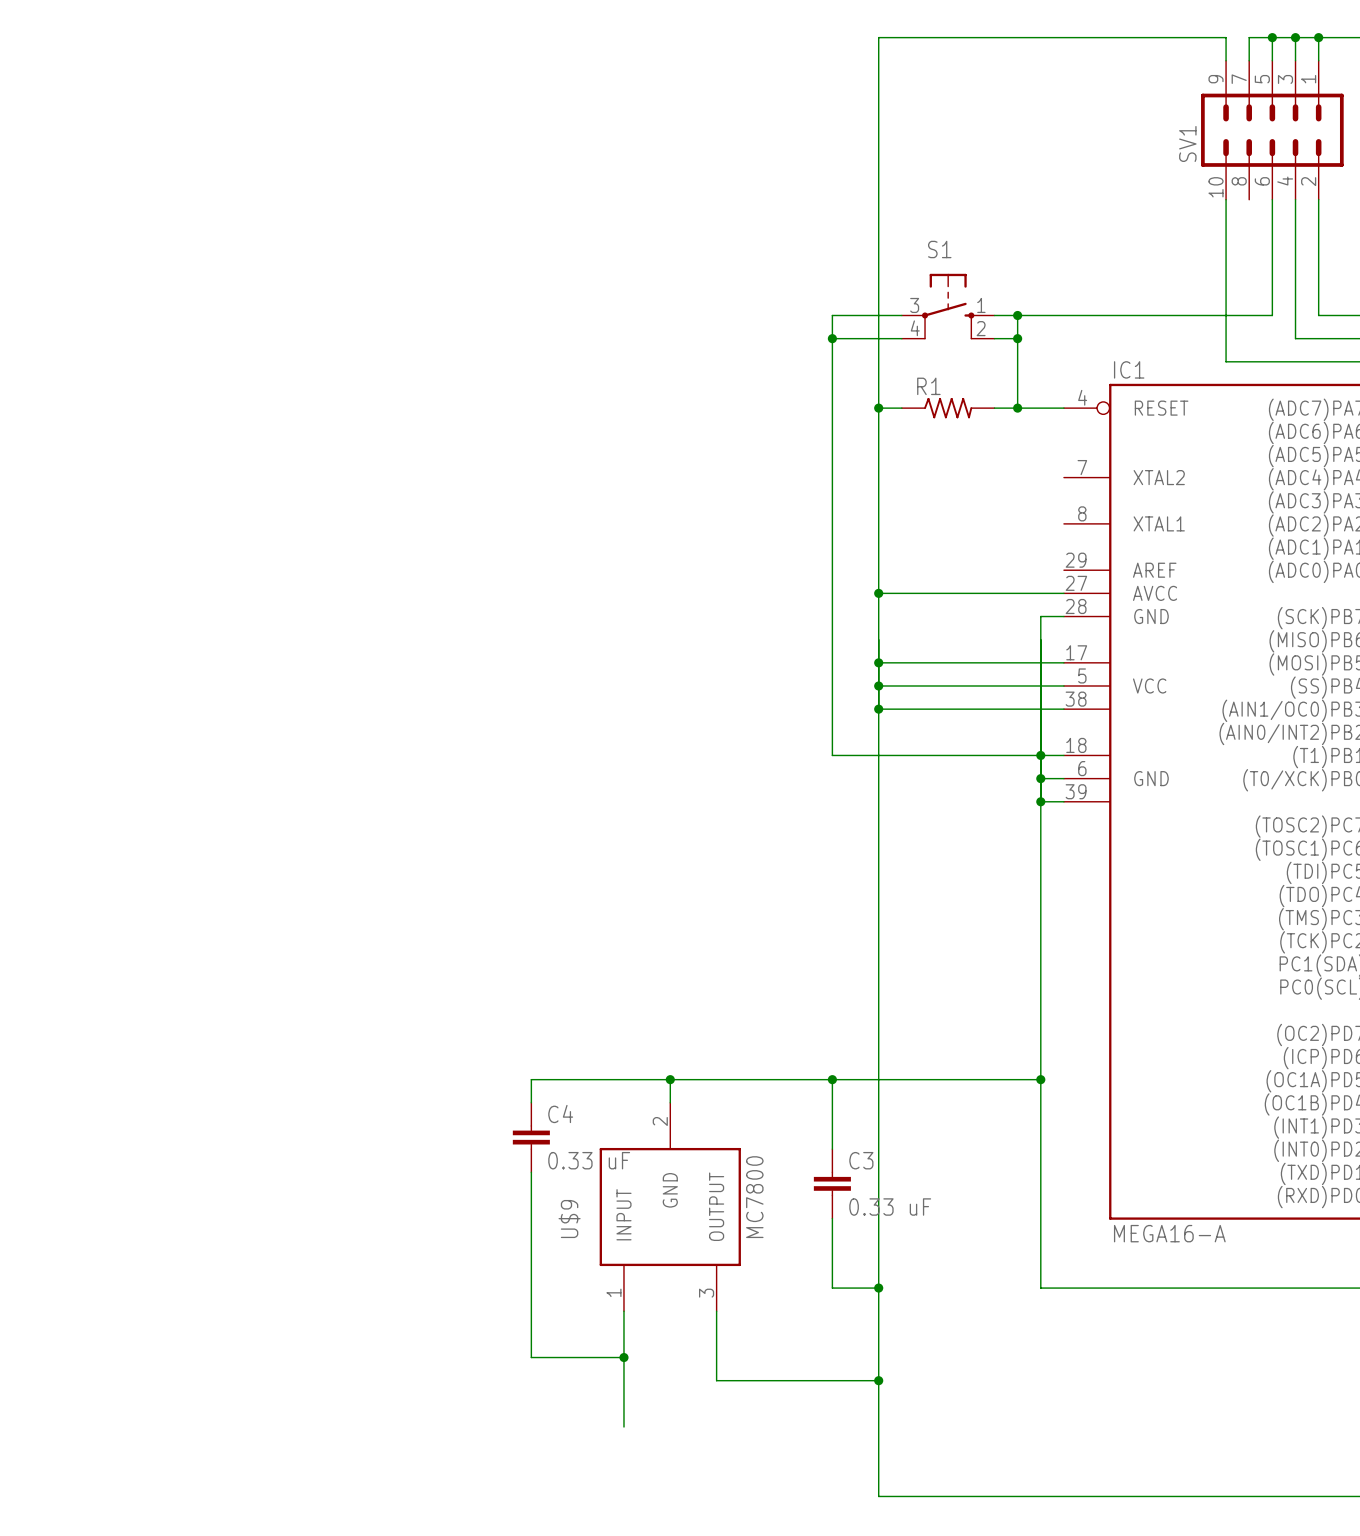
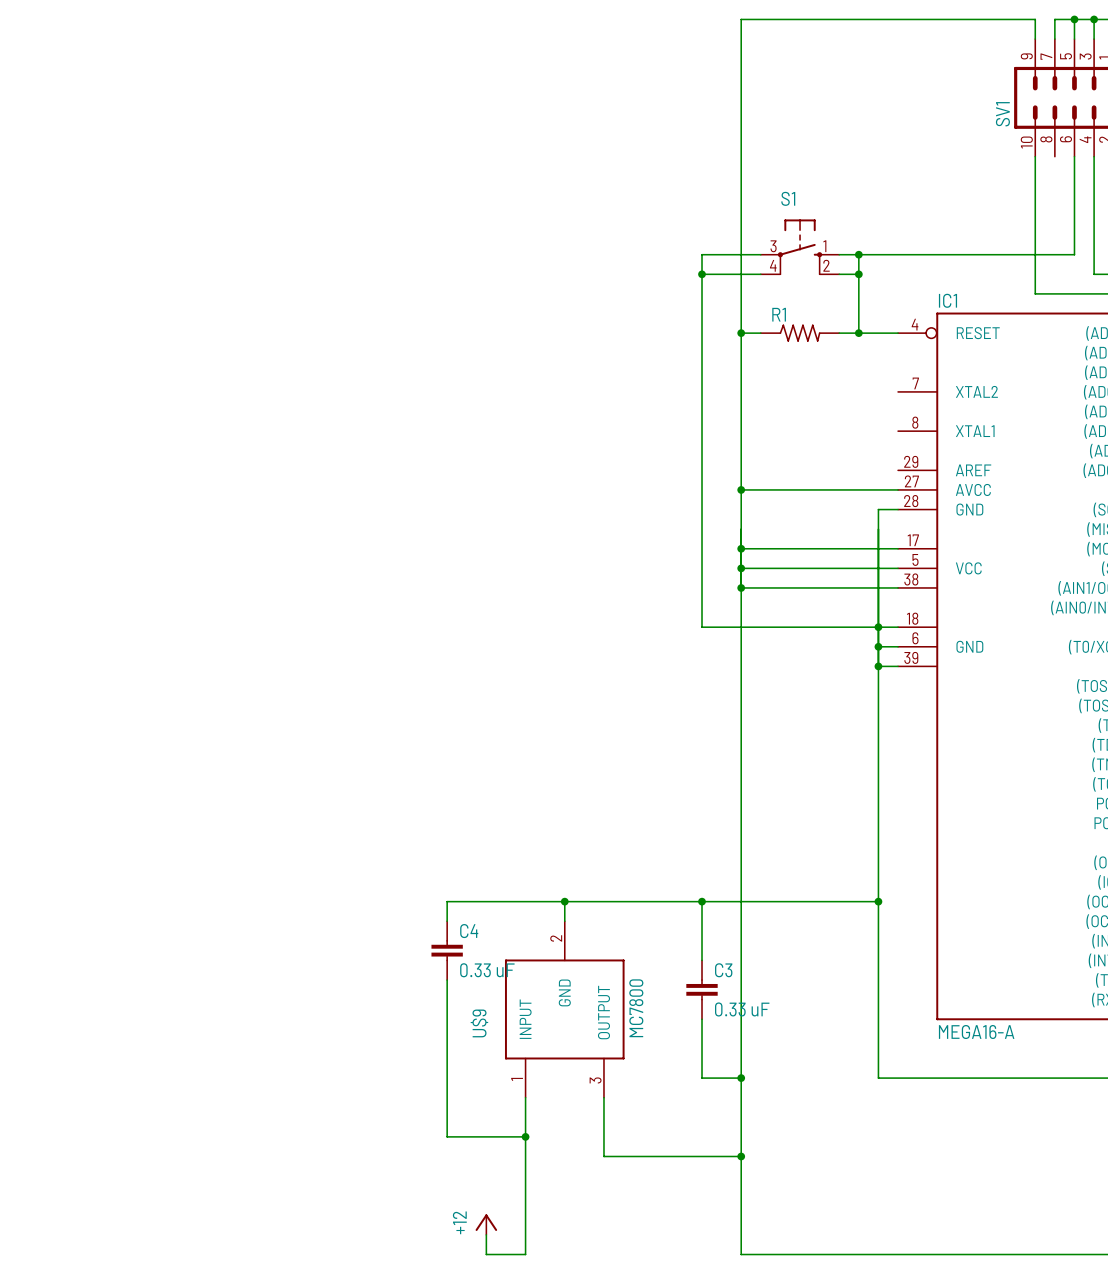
wire: none -> (525, 1195) (525, 1254) (486, 1254) (486, 1234)
power symbol: none -> +12 (486, 1224)

